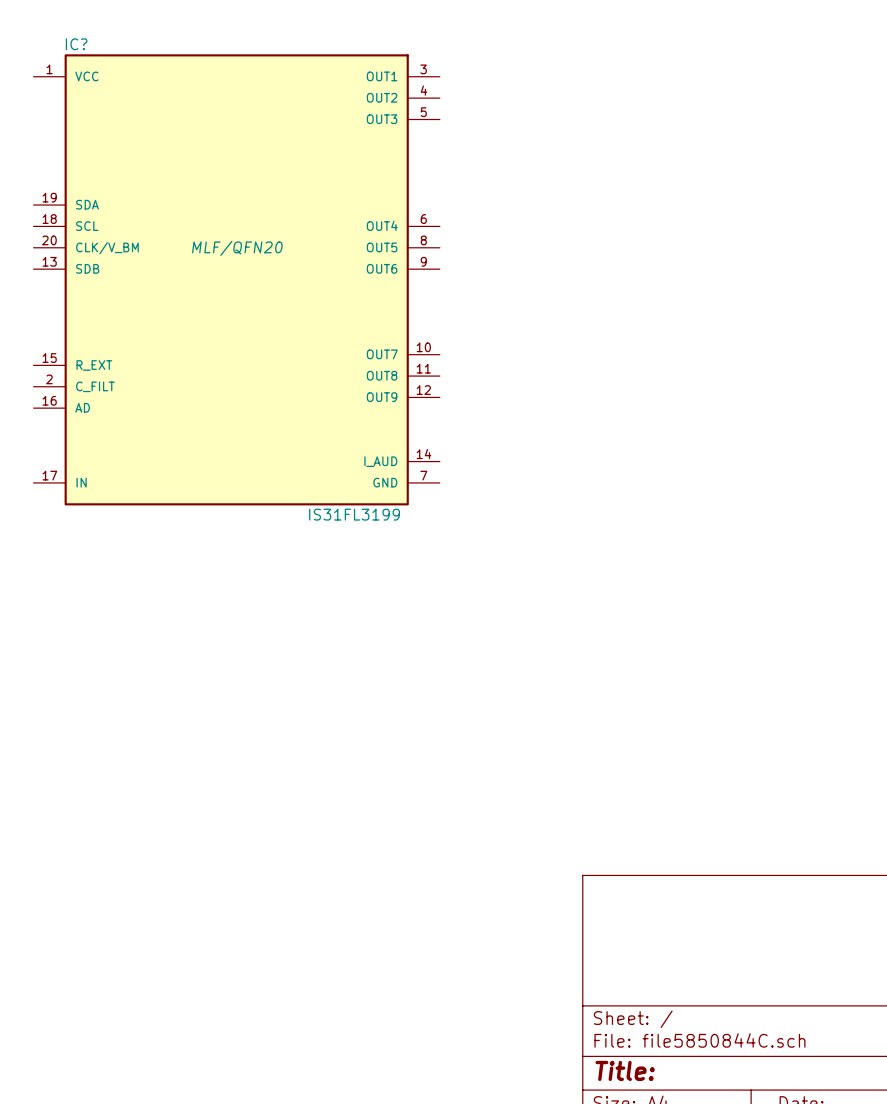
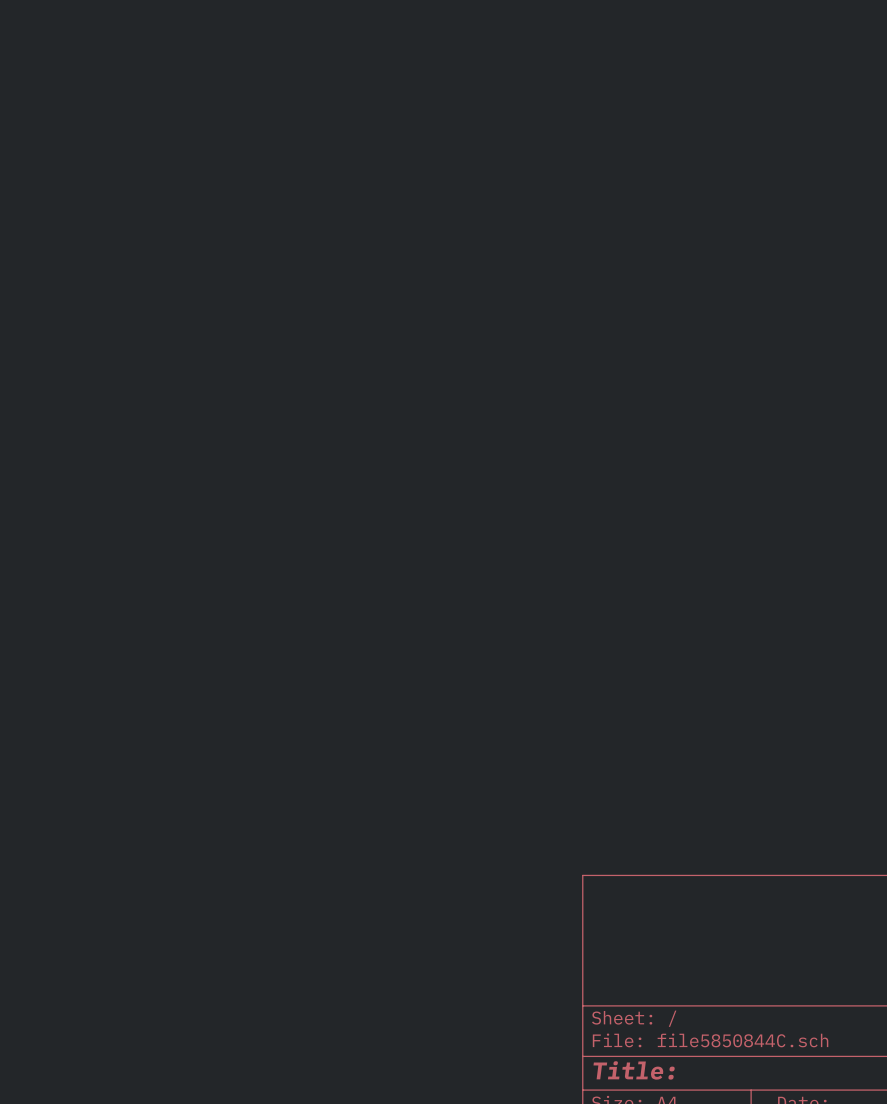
IC?: IS31FL3199 (236, 279) -> none

